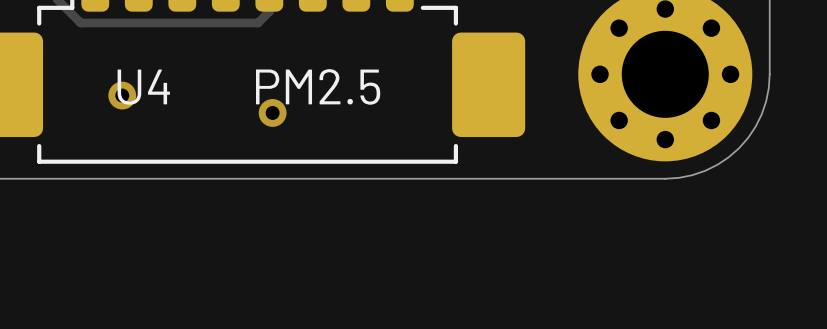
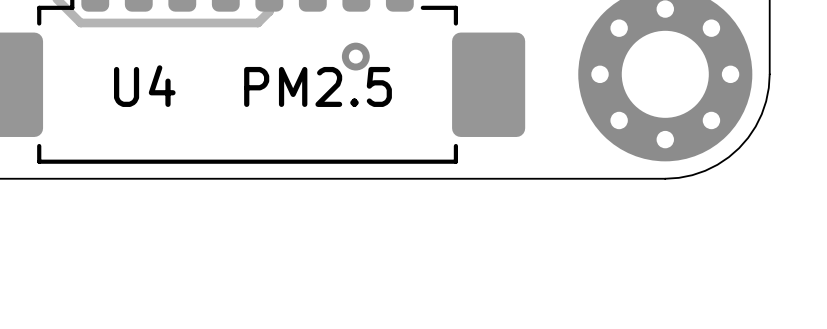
via: (122, 95) -> none
via position: (272, 112) -> (355, 56)

